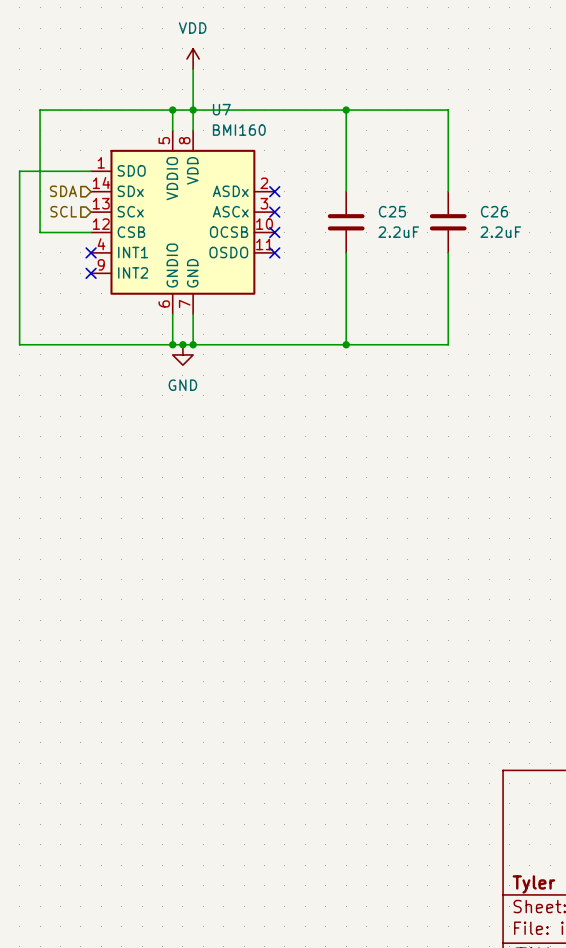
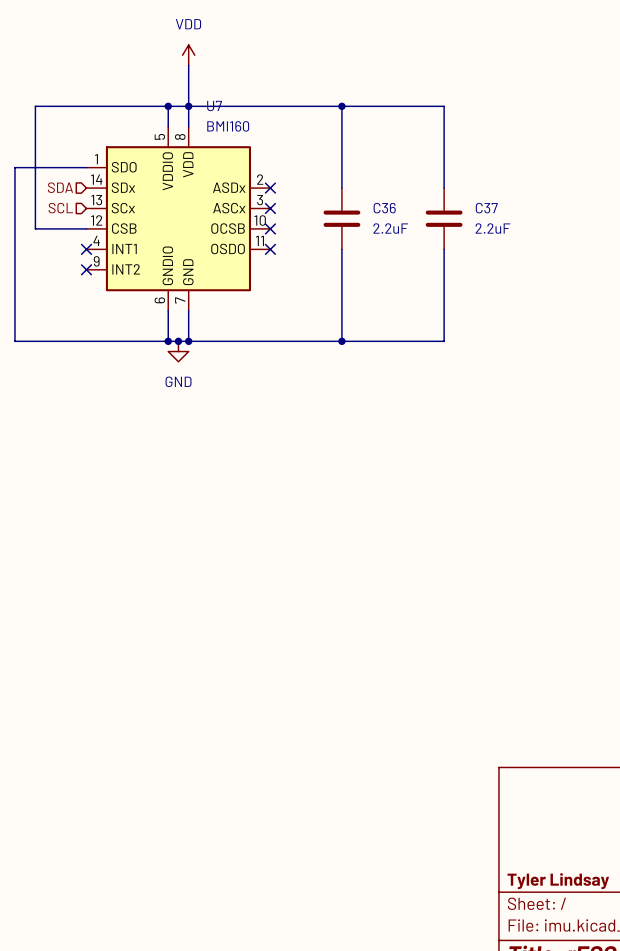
C25 name: C25 (392, 211) -> C36 (384, 208)
C26 name: C26 (494, 211) -> C37 (486, 208)

